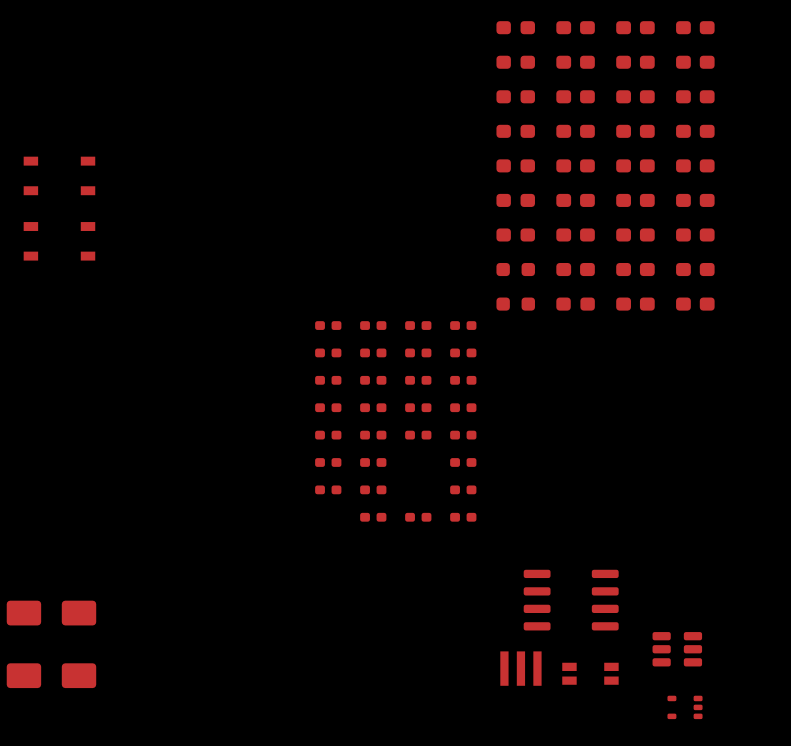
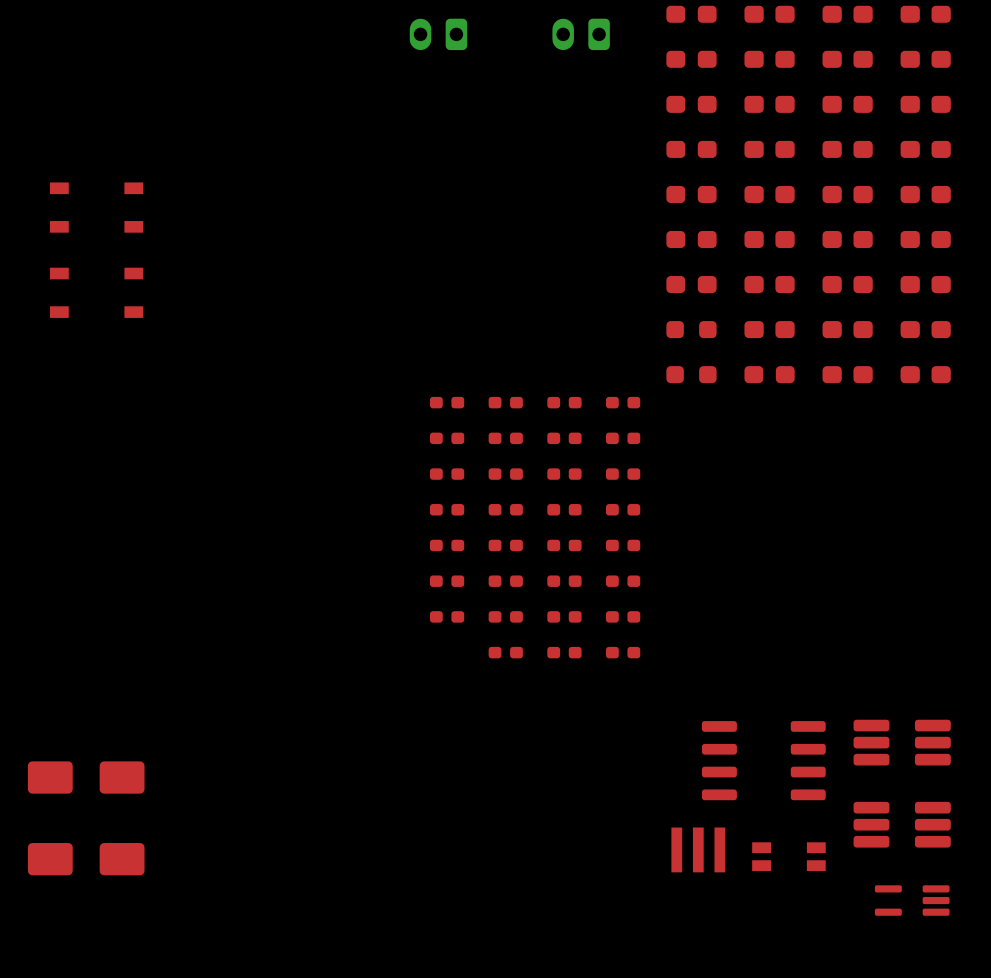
part: none -> (438, 34)
part: none -> (581, 34)
part: none -> (564, 581)
part: none -> (564, 616)
part: none -> (902, 742)
part footprint: [652, 632, 703, 667] -> [853, 801, 951, 848]
part footprint: [667, 695, 703, 720] -> [874, 885, 950, 916]

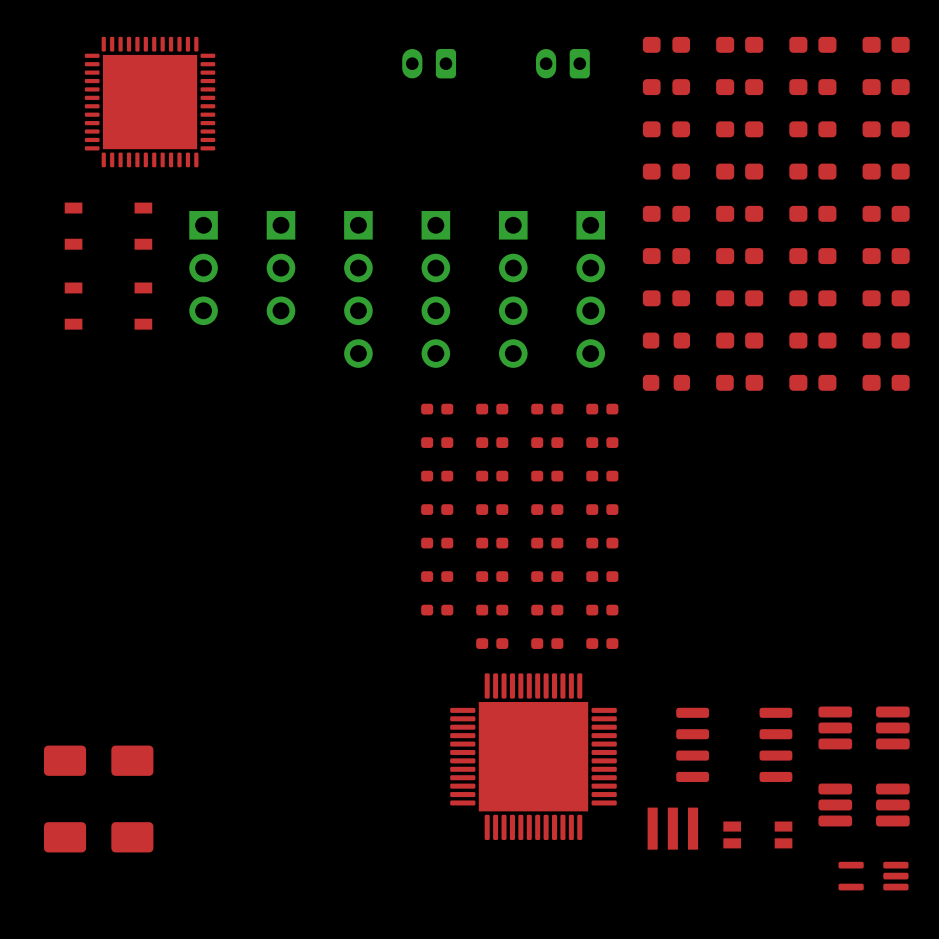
part: none -> (150, 102)
part: none -> (203, 268)
part: none -> (281, 268)
part: none -> (358, 289)
part: none -> (435, 289)
part: none -> (513, 289)
part: none -> (590, 289)
part: none -> (533, 756)

